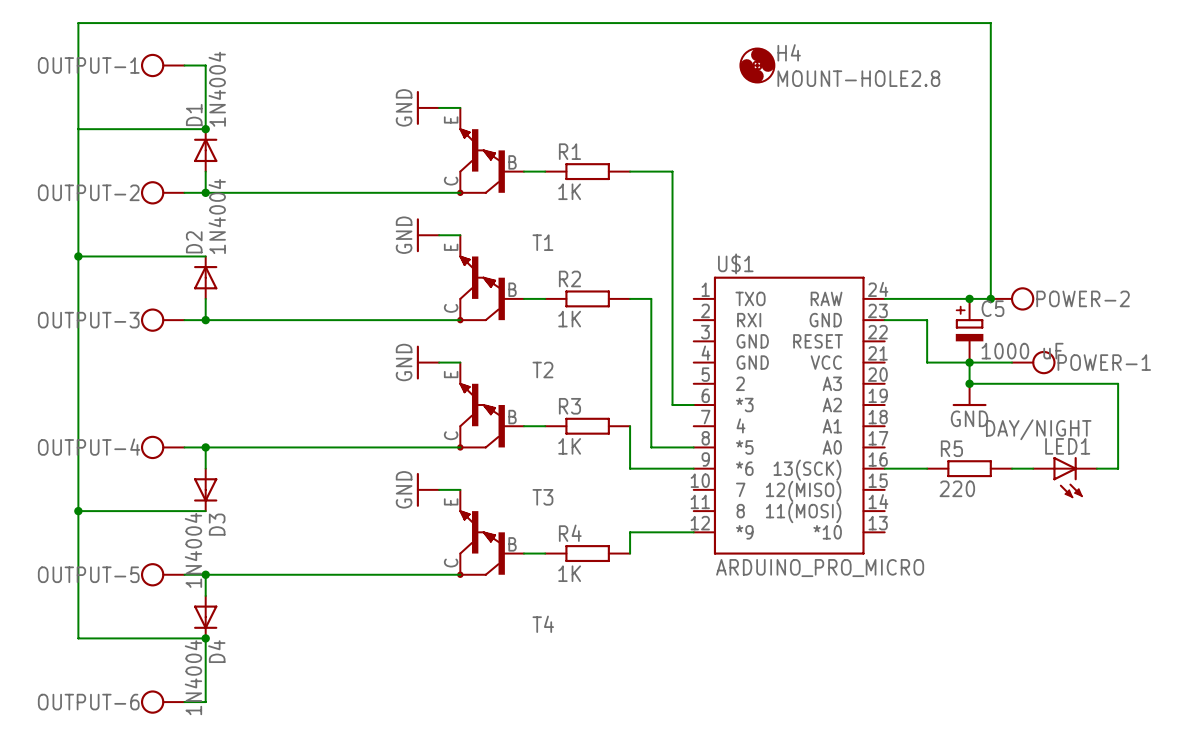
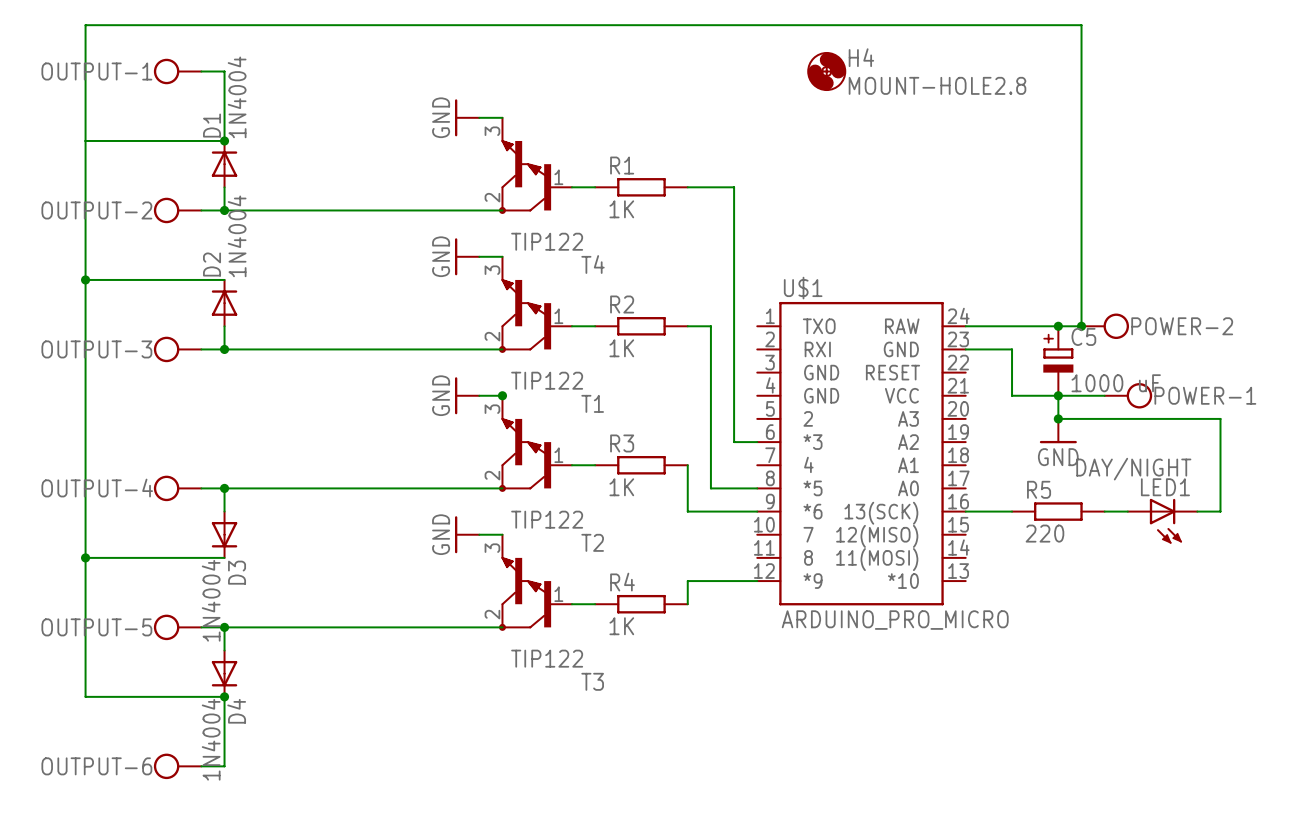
T1 pin number: E (451, 119) -> 3 (492, 270)
T1 position: (490, 151) -> (535, 304)
T1 pin number: B (512, 162) -> 1 (558, 316)
T1 pin number: C (451, 181) -> 2 (492, 336)
T4 value: none -> TIP122 (547, 241)
T2 pin number: E (451, 247) -> 3 (492, 409)
T2 position: (490, 279) -> (535, 443)
T2 pin number: B (512, 289) -> 1 (558, 455)
T2 pin number: C (451, 308) -> 2 (492, 475)
T1 value: none -> TIP122 (547, 380)
junction: none -> (502, 395)
T3 pin number: E (451, 374) -> 3 (492, 548)
T3 position: (490, 406) -> (535, 582)
T3 pin number: B (512, 417) -> 1 (558, 594)
T3 pin number: C (451, 435) -> 2 (492, 614)
T2 value: none -> TIP122 (547, 519)
T4 pin number: E (451, 501) -> 3 (492, 131)
T4 position: (490, 533) -> (535, 165)
T4 pin number: B (512, 544) -> 1 (558, 177)
T4 pin number: C (451, 563) -> 2 (492, 197)
T3 value: none -> TIP122 (547, 658)

